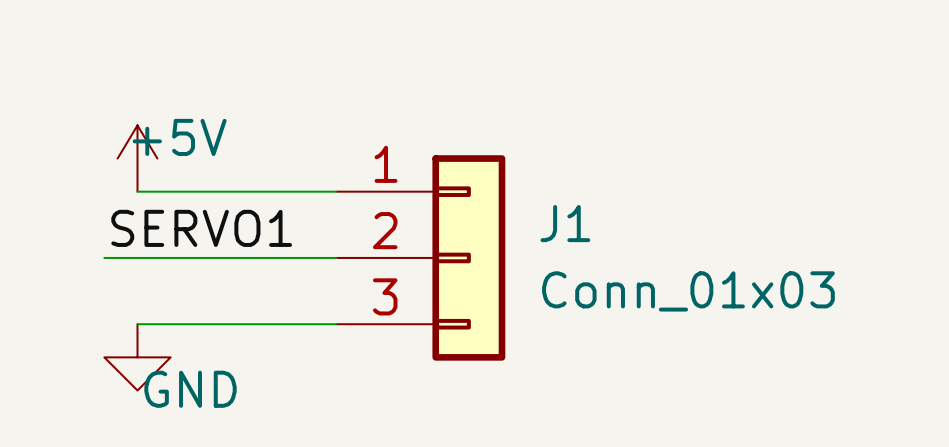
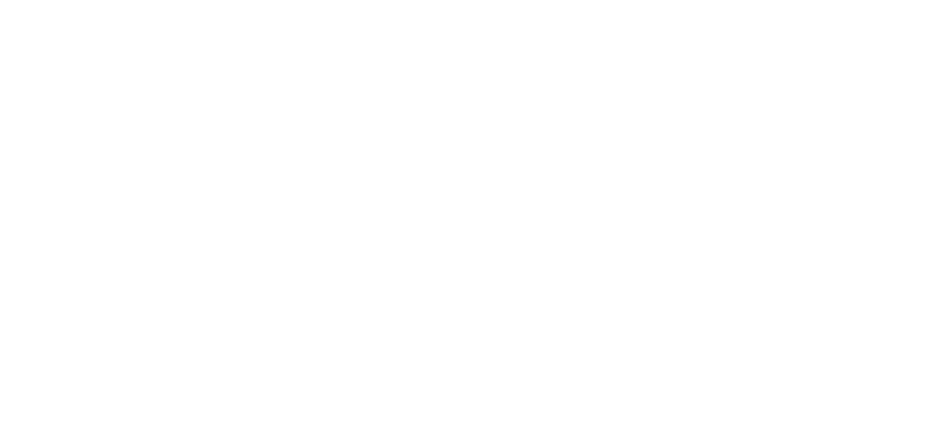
power symbol: +5V (137, 158) -> none
wire: (137, 191) (336, 191) -> none
label: SERVO1 (201, 228) -> none
wire: (104, 257) (336, 257) -> none
J1: Conn_01x03 (420, 257) -> none
wire: (137, 324) (336, 324) -> none
power symbol: GND (137, 357) -> none

